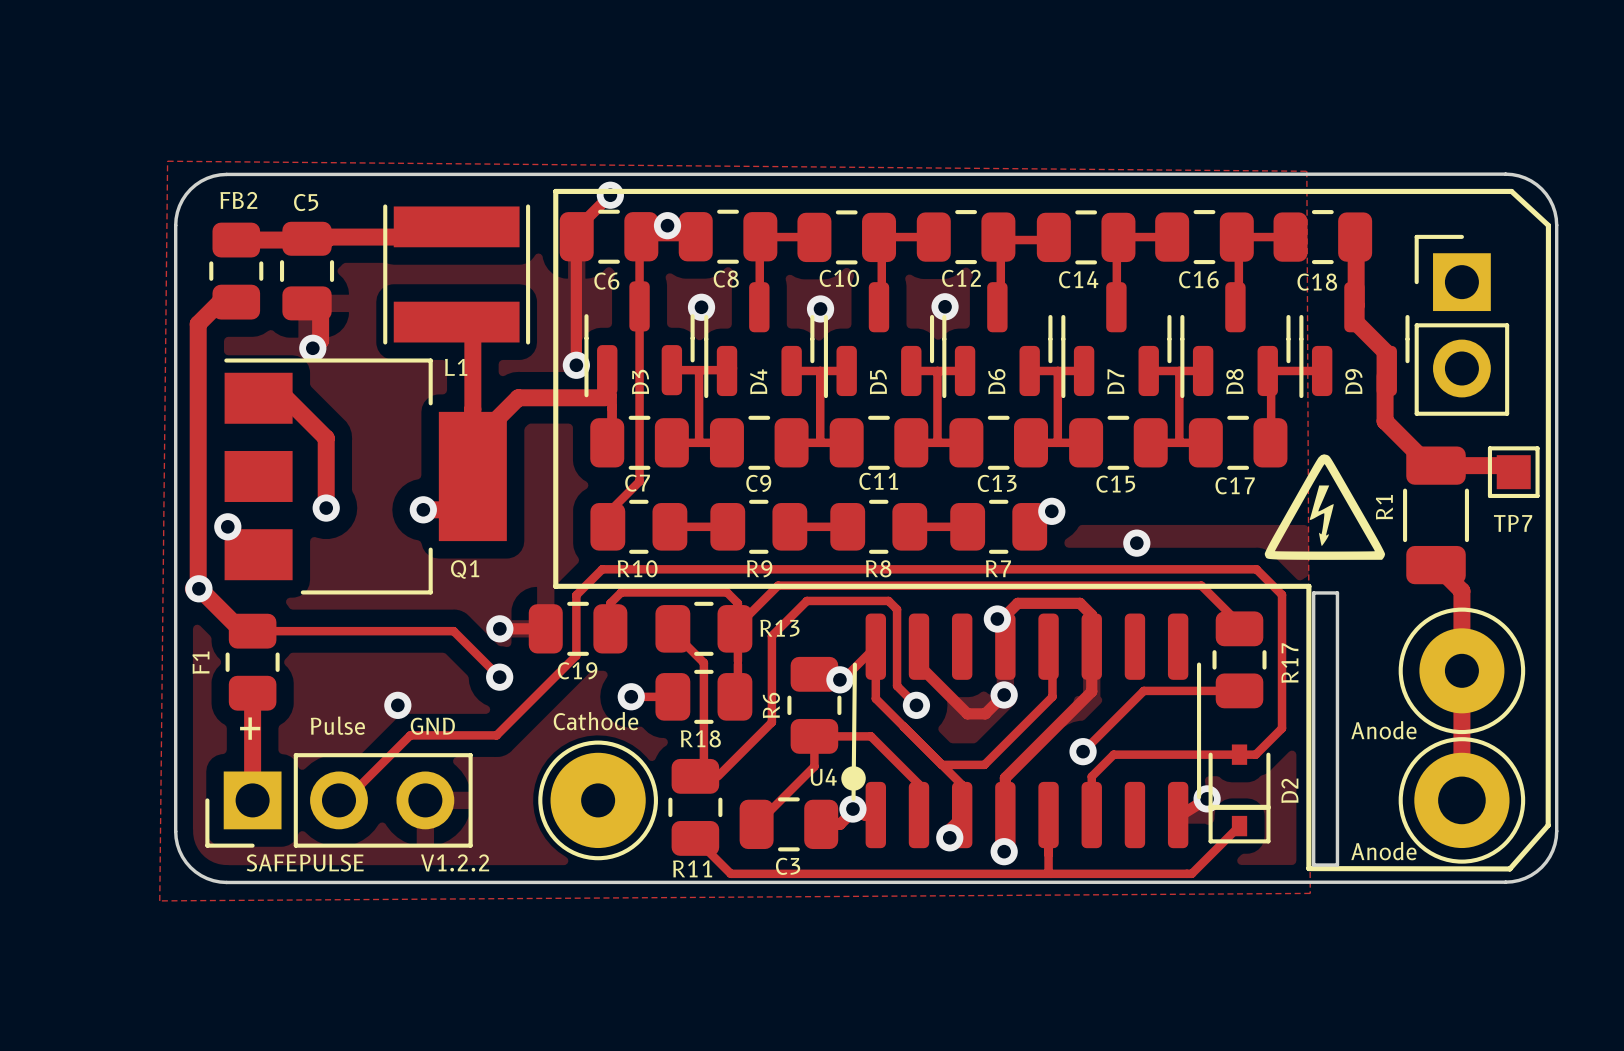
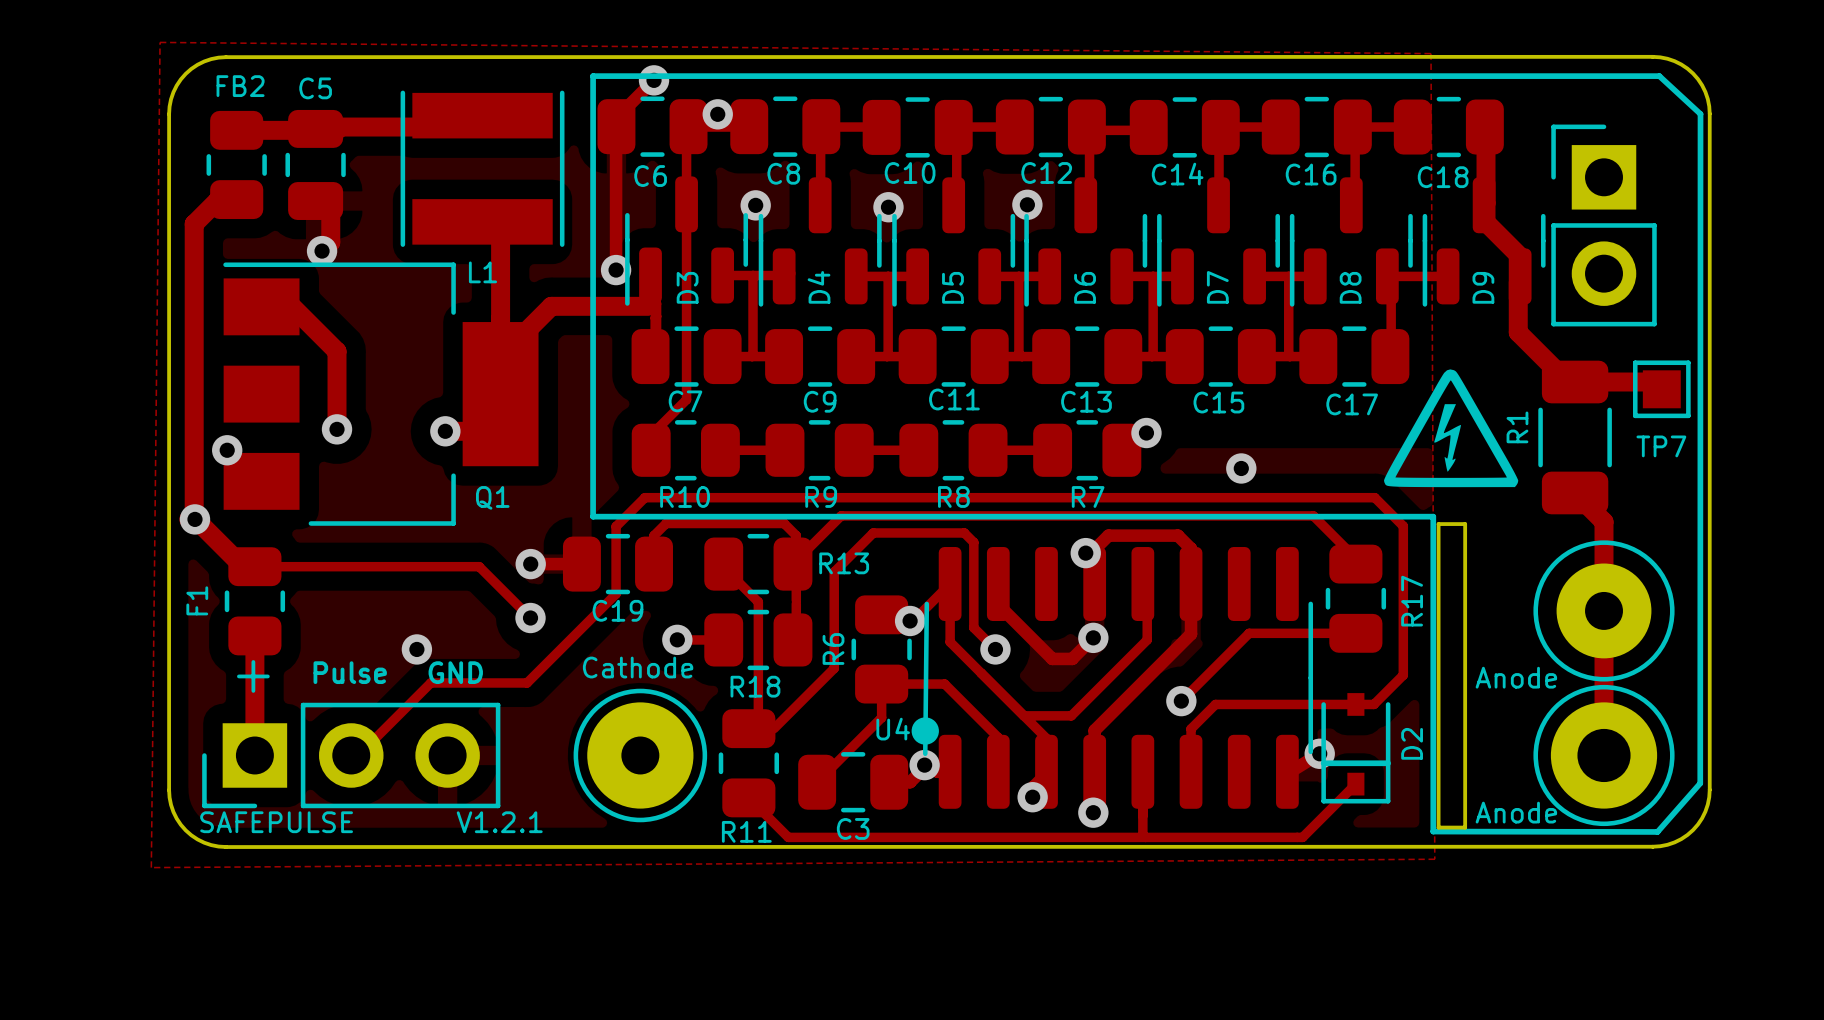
text: SAFEPULSE V1.2.2 (367, 862) -> SAFEPULSE V1.2.1 (371, 822)

